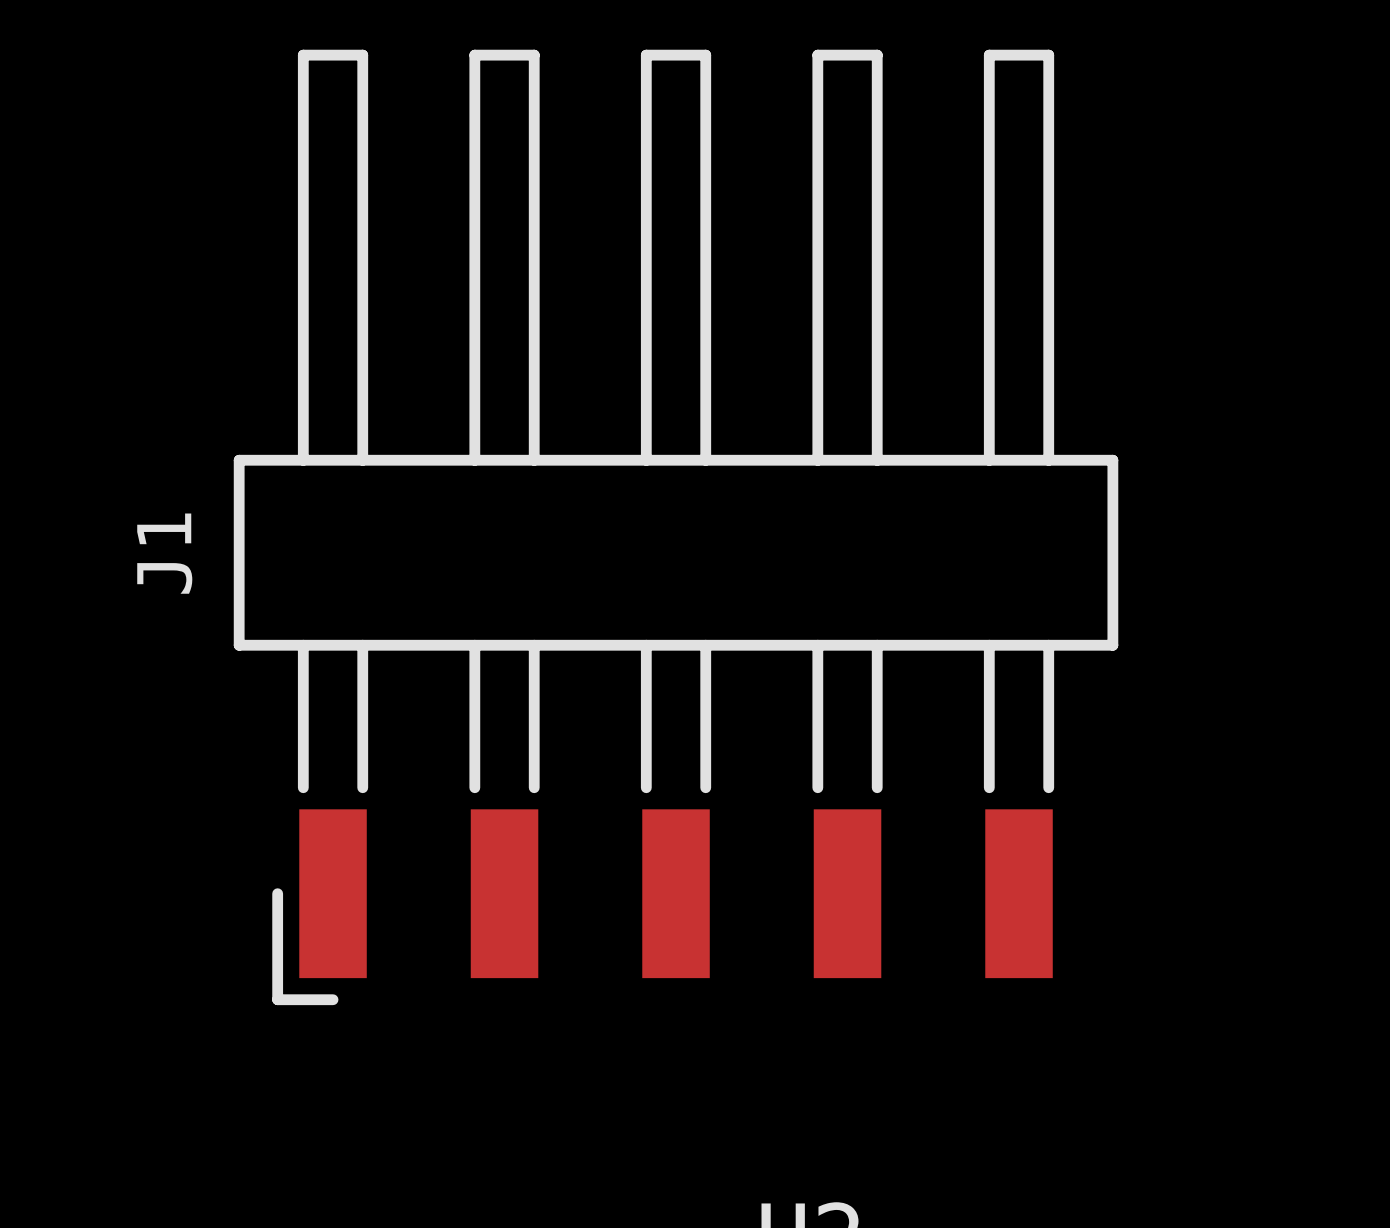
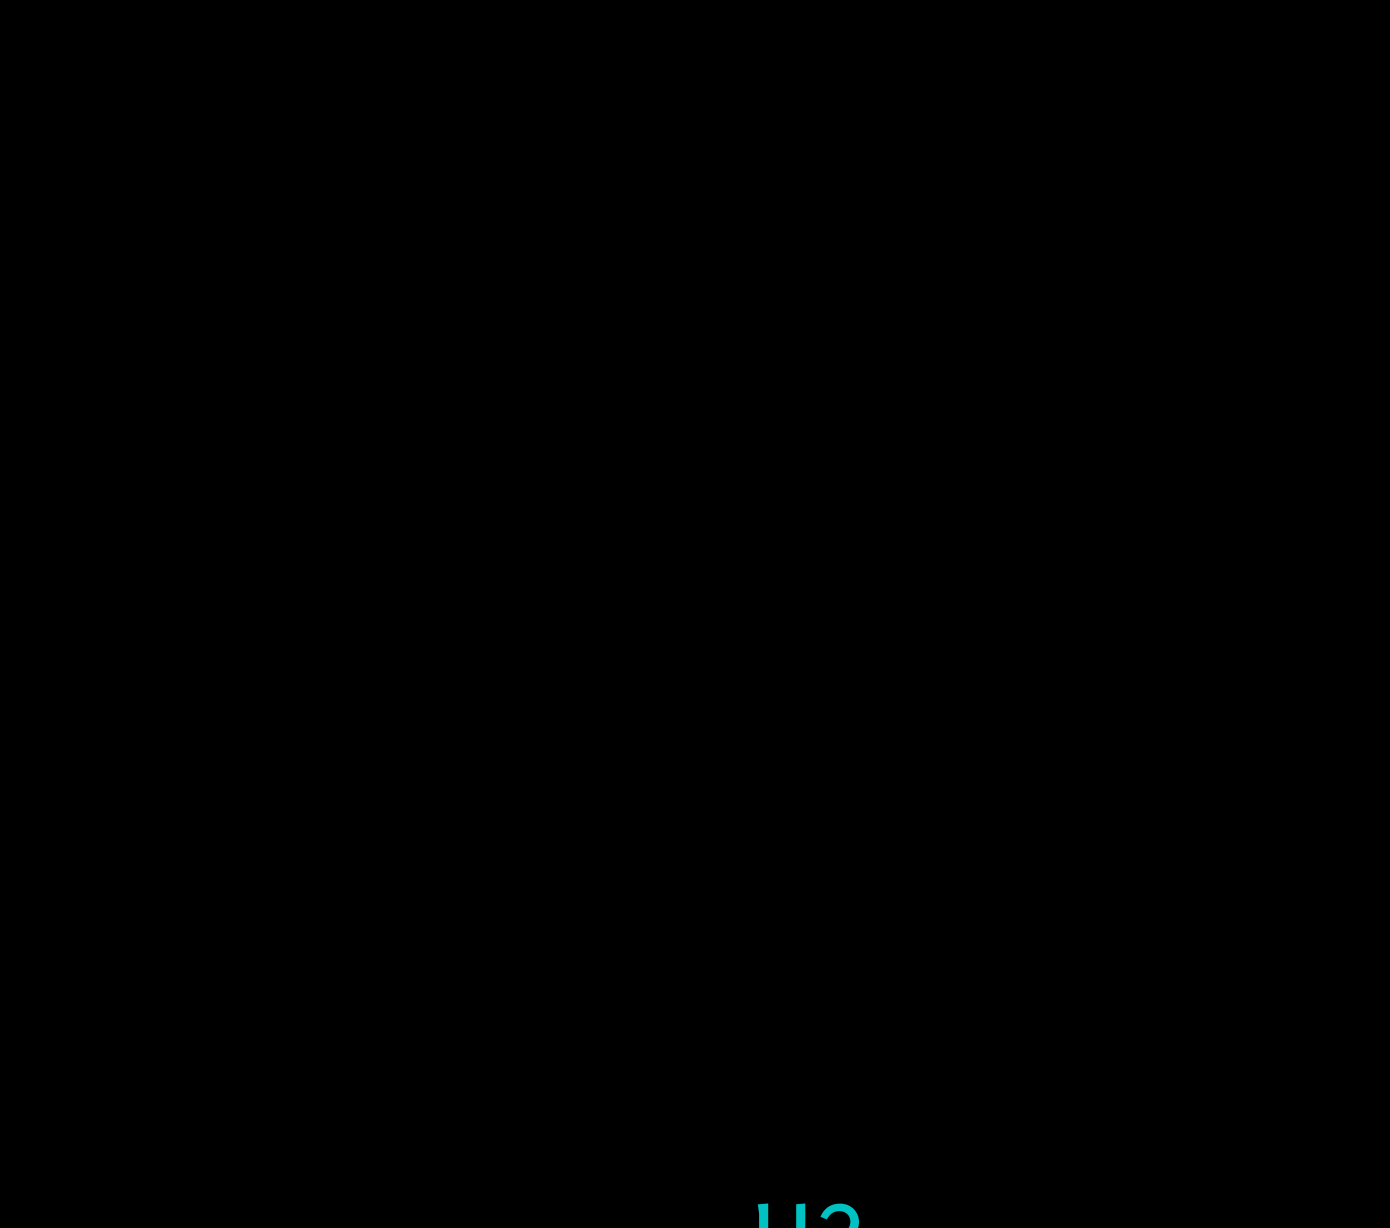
J1: (676, 527) -> none

